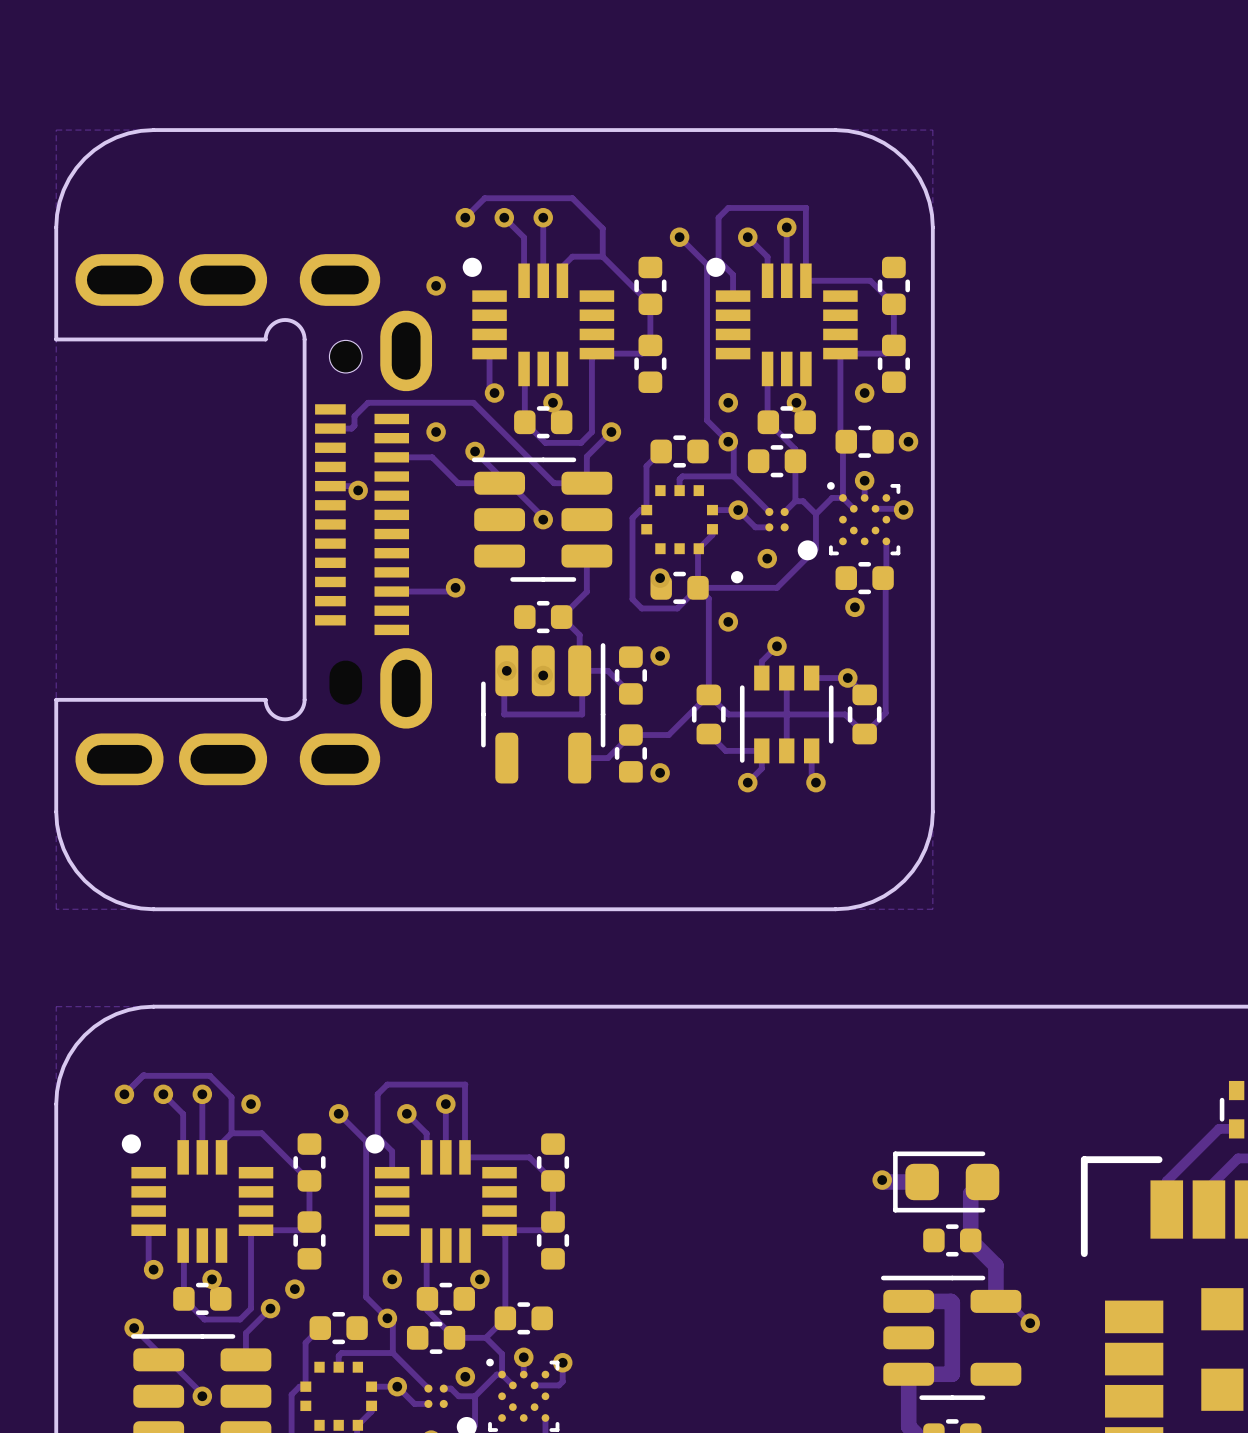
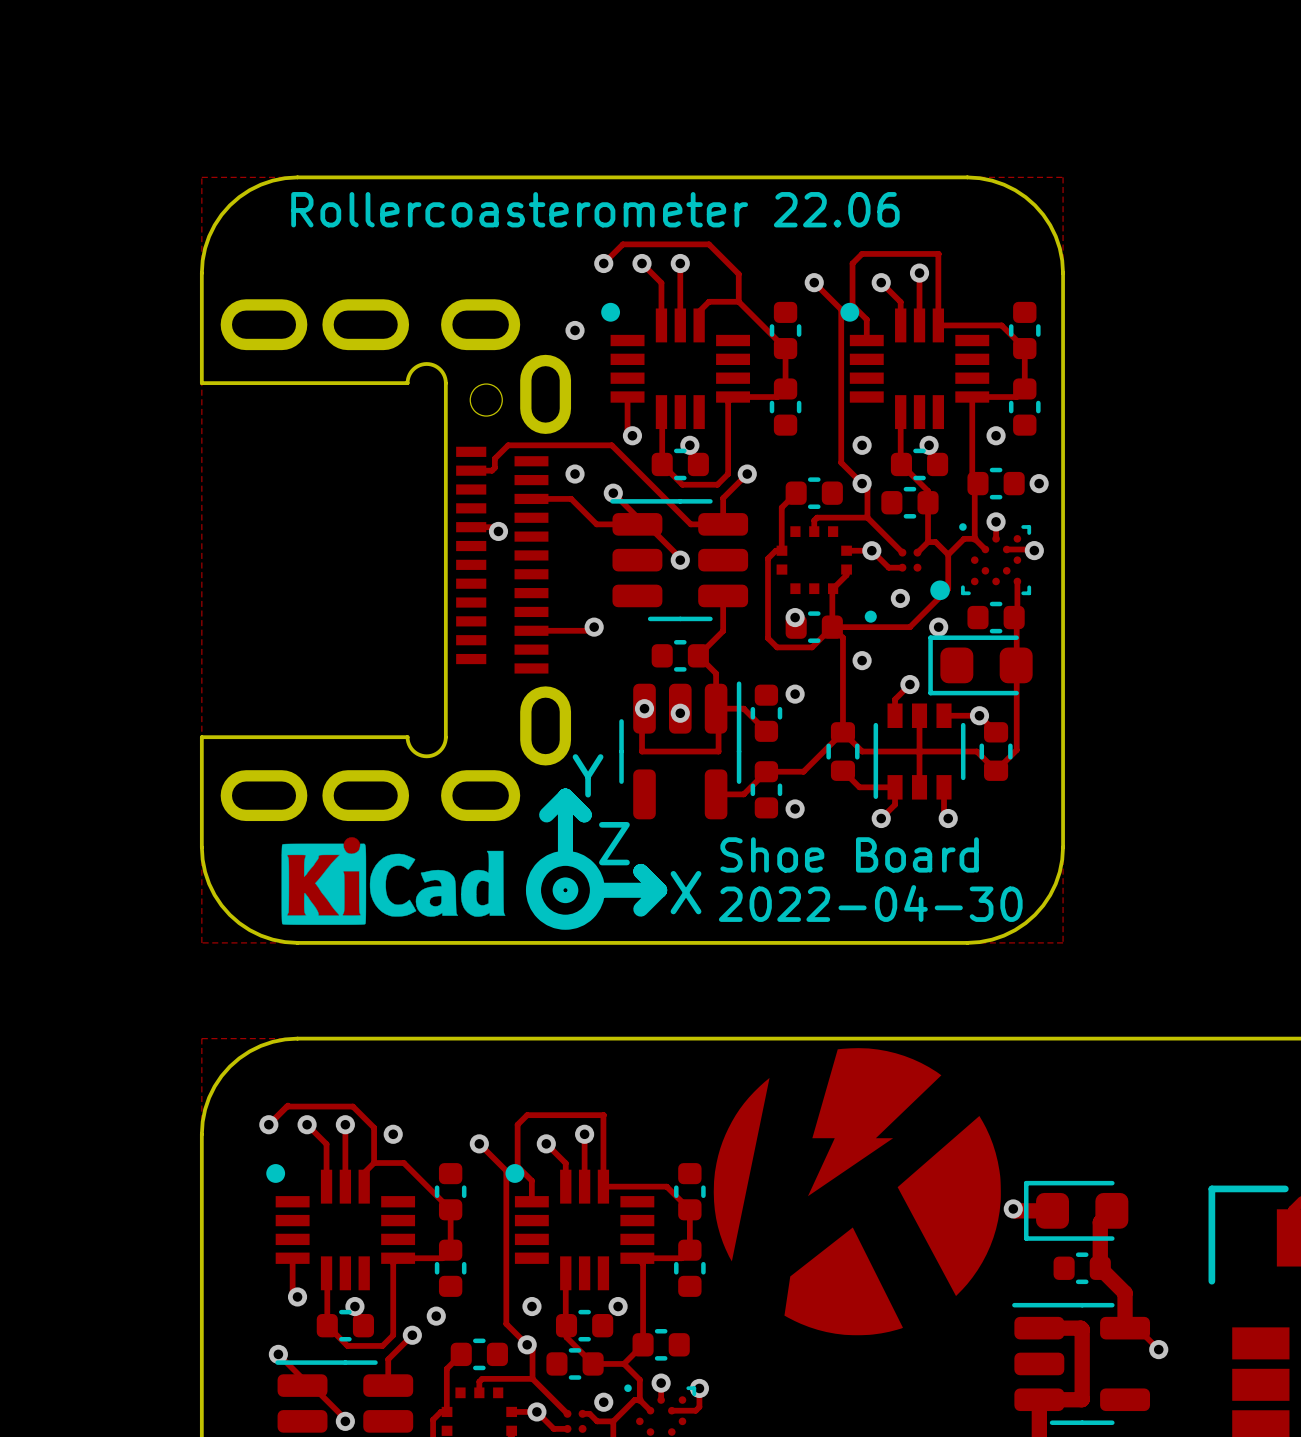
text: none -> Rollercoasterometer 22.06 (595, 209)
via position: (854, 607) -> (938, 627)
part: none -> (980, 665)
drawing: none -> [281, 788, 668, 930]
text: none -> Shoe Board (849, 854)
text: none -> 2022-04-30 (870, 903)
drawing: none -> [713, 1048, 1001, 1336]

